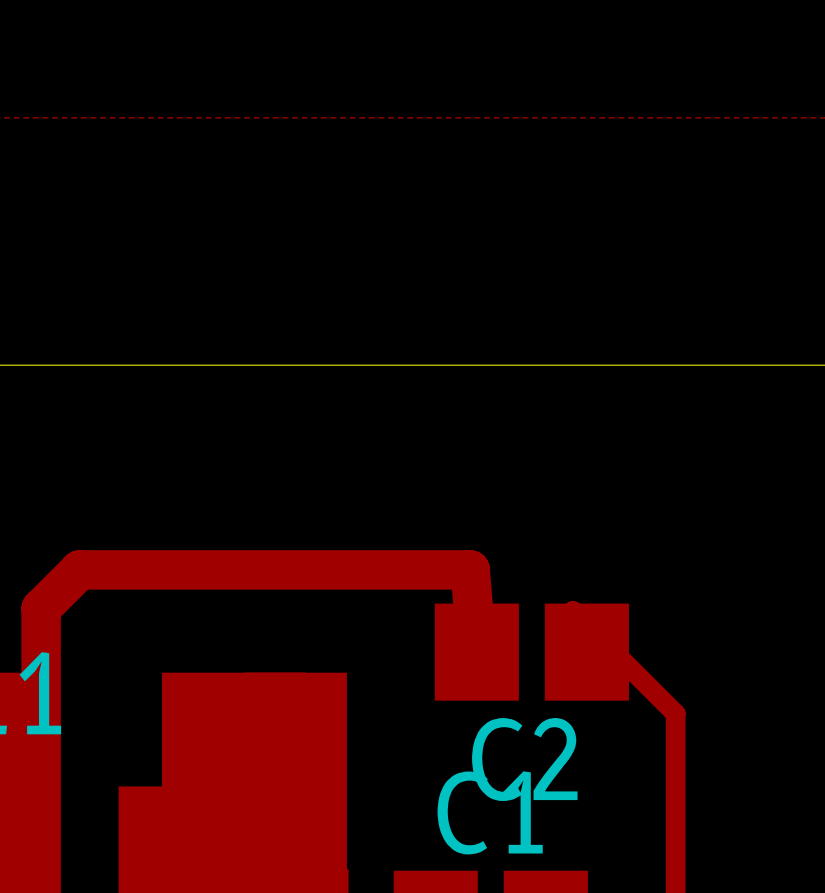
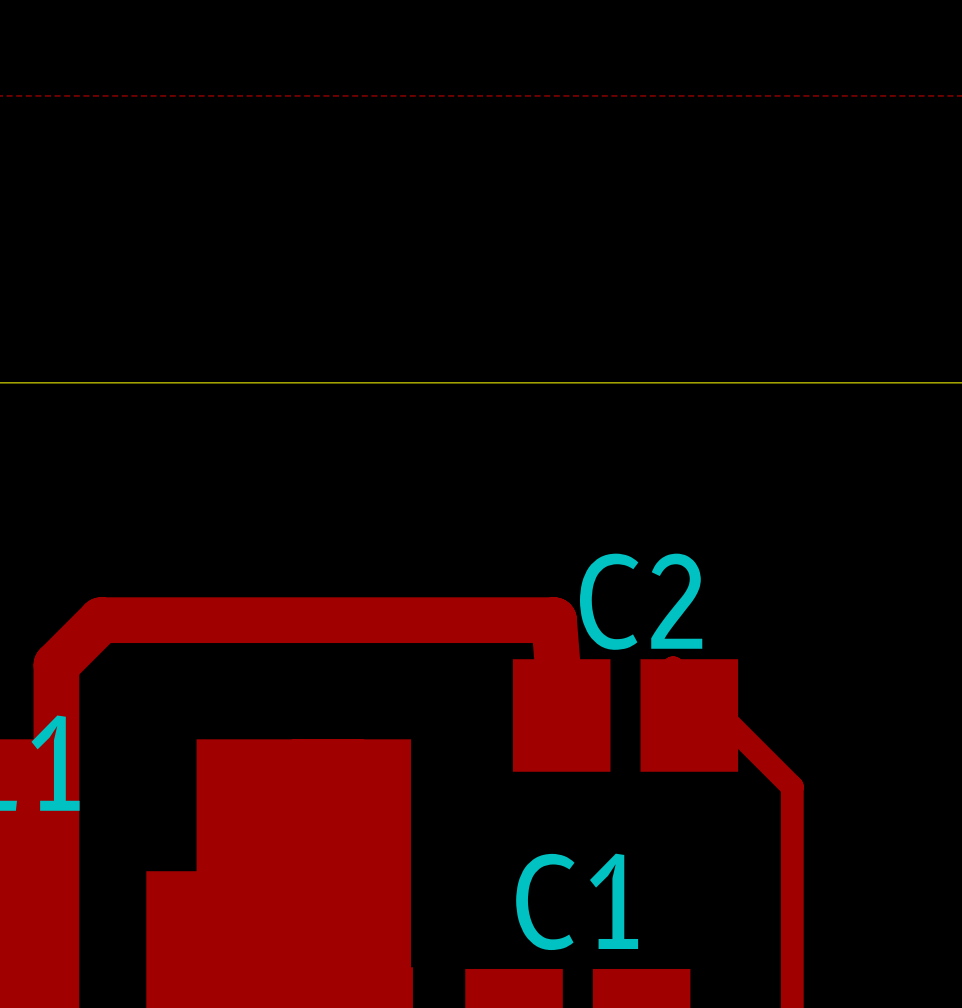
C2 name position: C2 (524, 759) -> C2 (641, 601)

